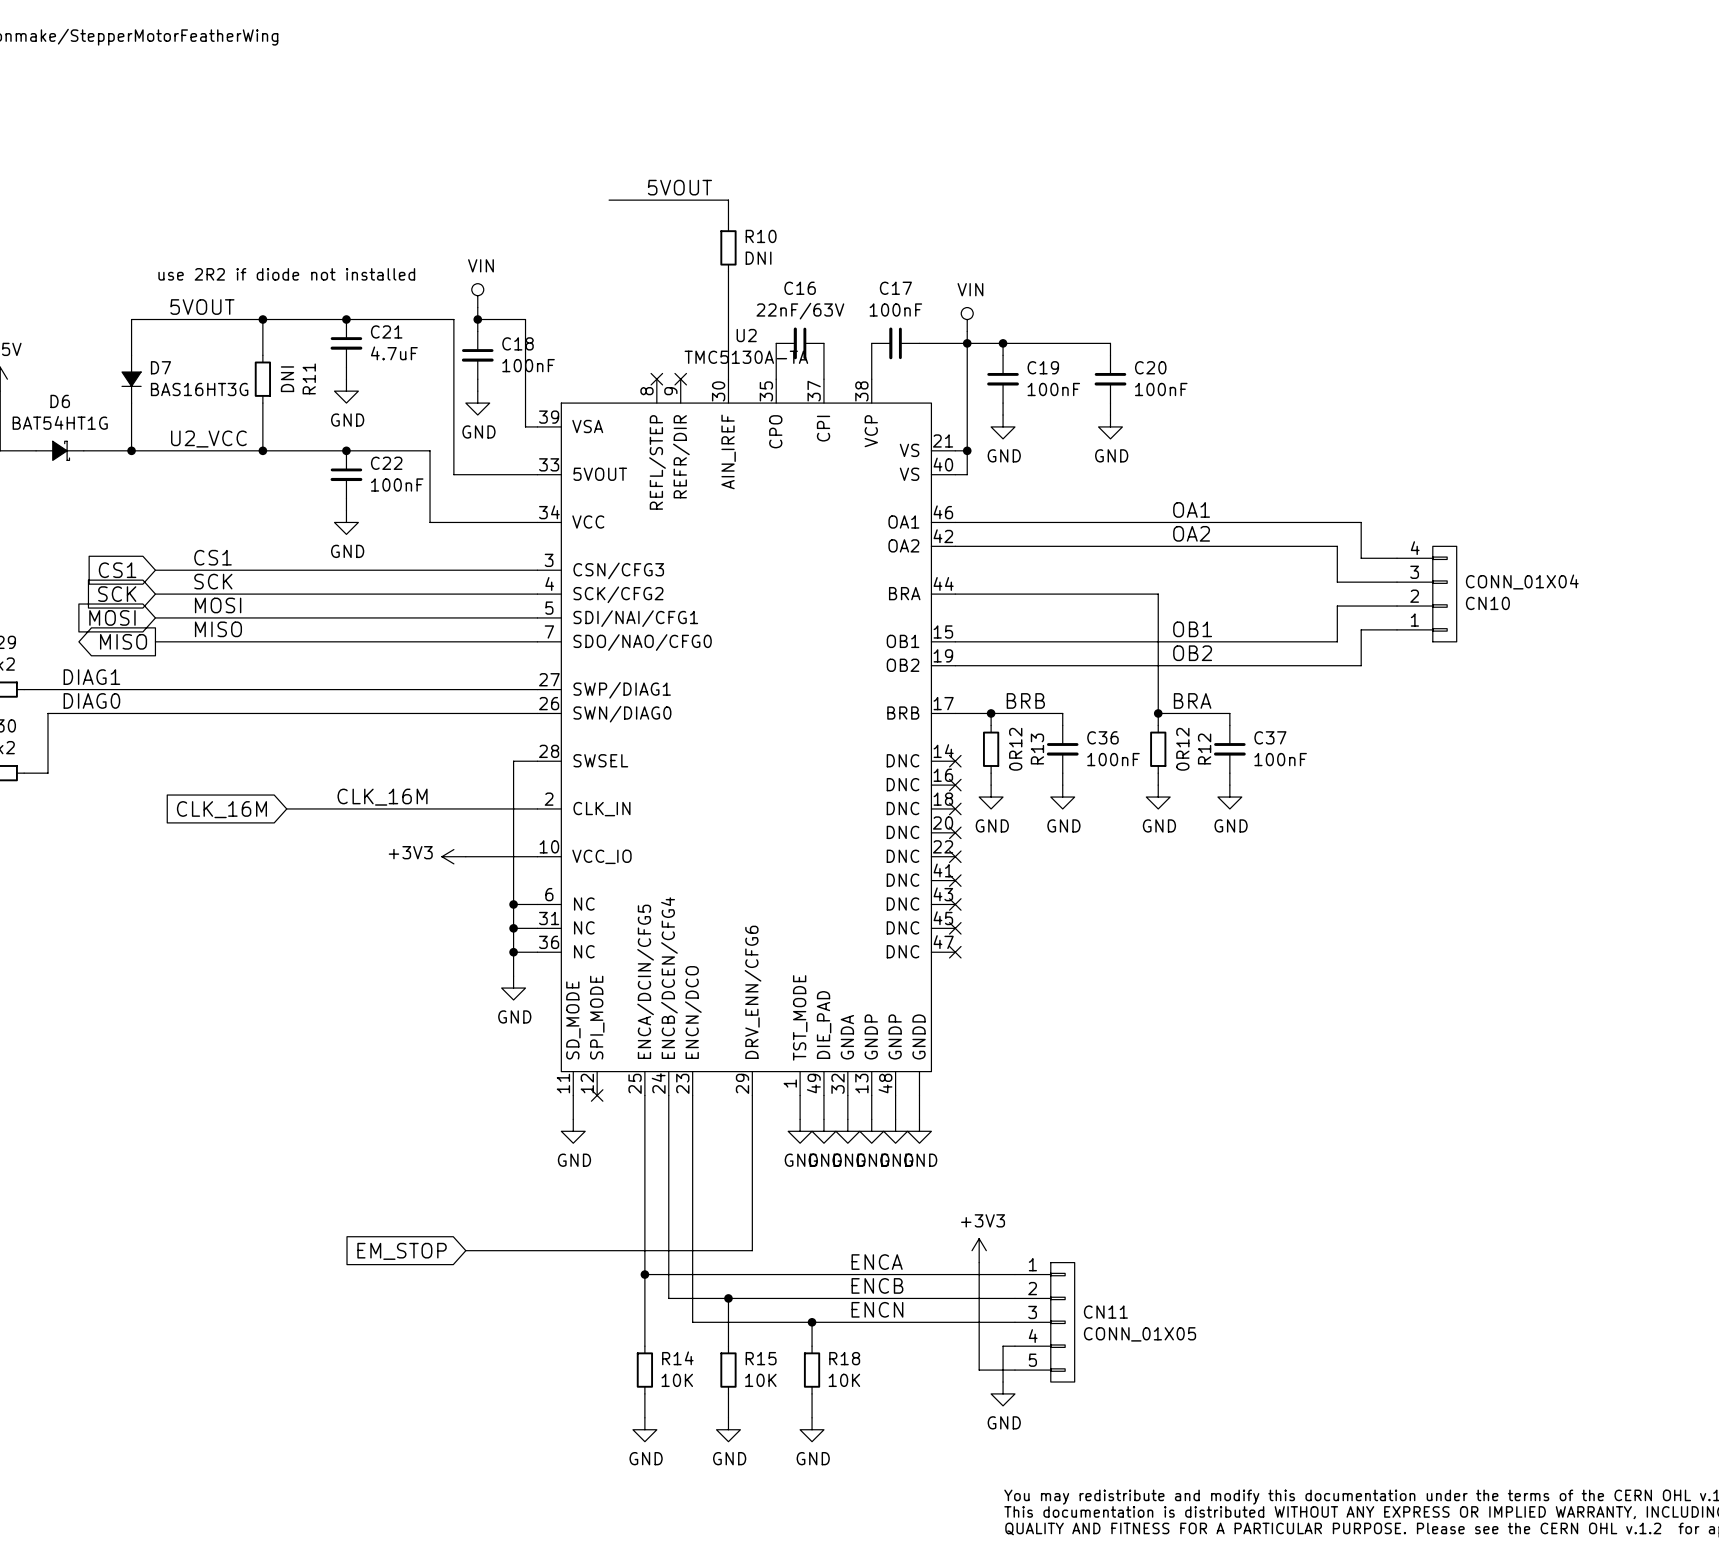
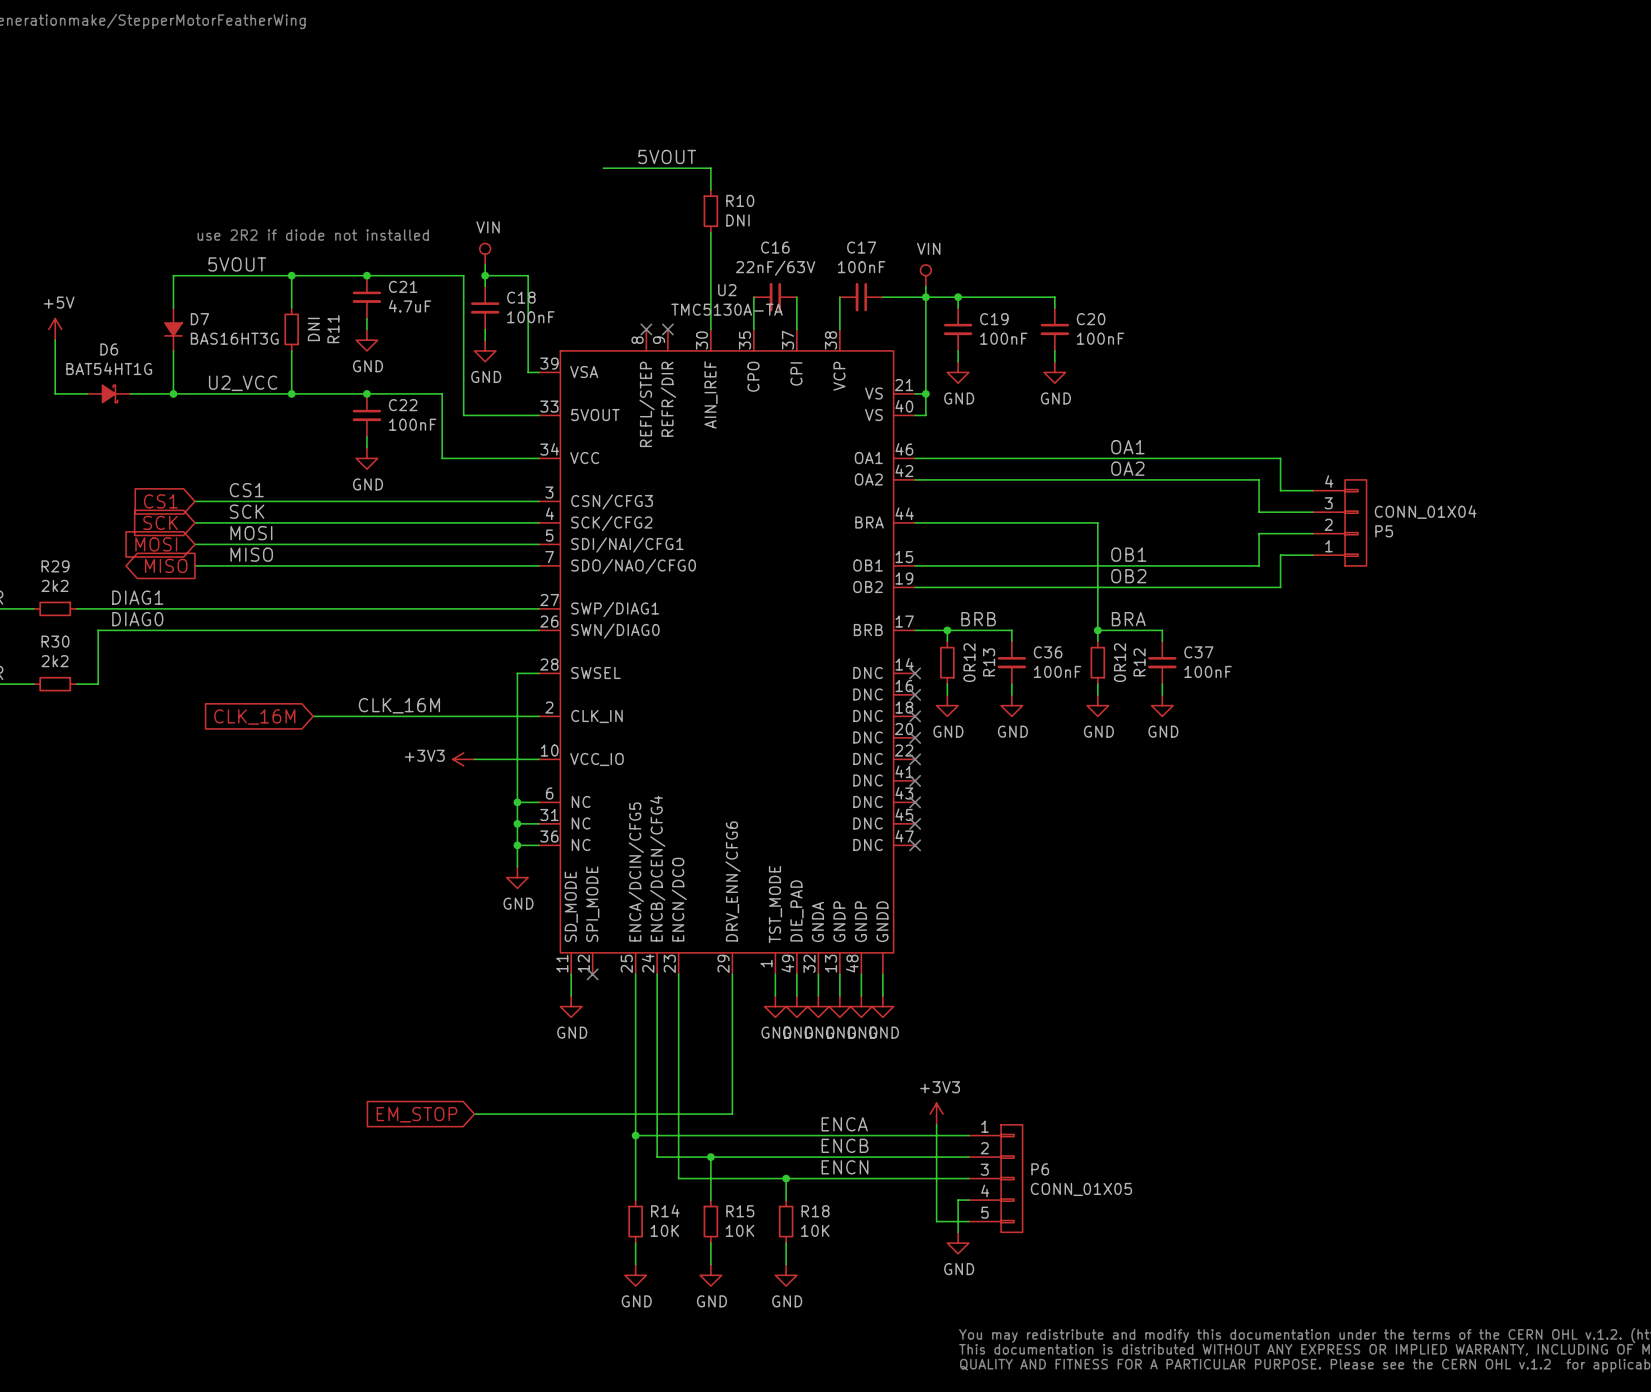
CN10 name: CN10 (1487, 603) -> P5 (1384, 531)
CN11 name: CN11 (1105, 1312) -> P6 (1040, 1169)

